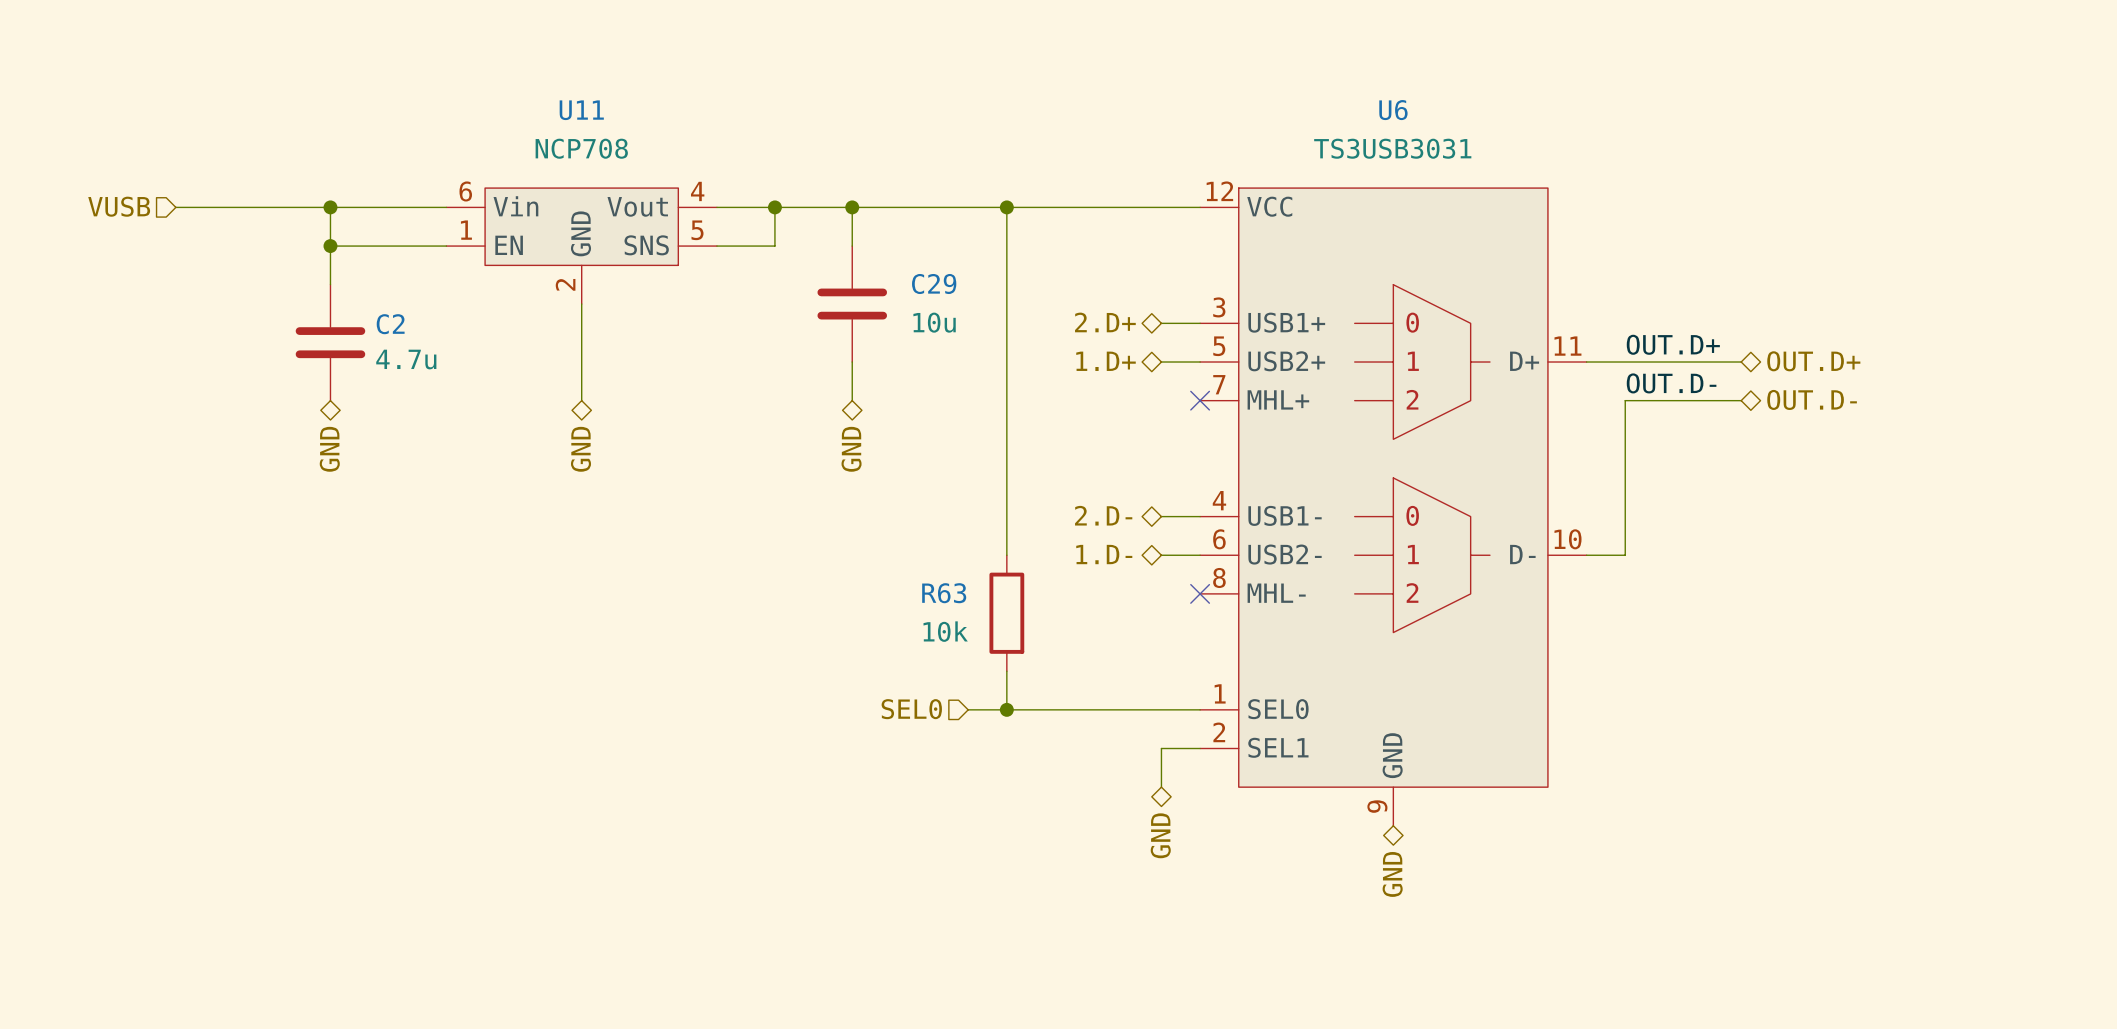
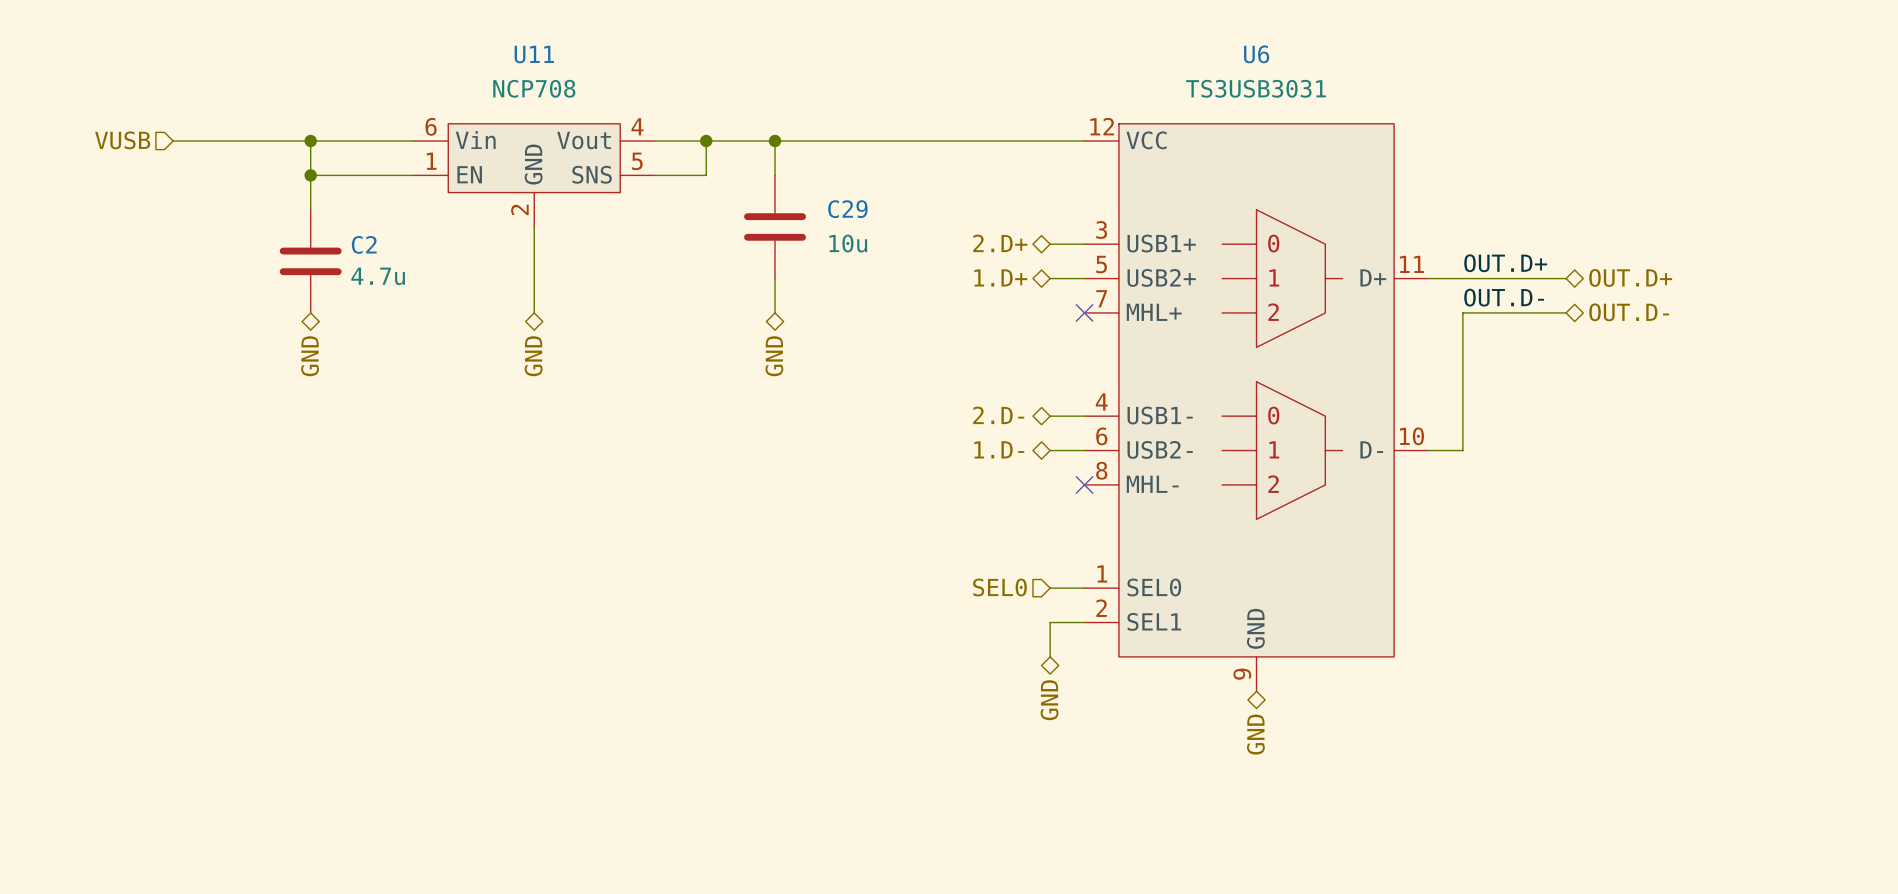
wire: (1006, 207) (1006, 555) -> none
junction: (1006, 207) -> none
R63: 10k (1006, 613) -> none
wire: (1006, 671) (1006, 709) -> none
hierarchical label position: SEL0 (911, 709) -> SEL0 (999, 587)
wire: (968, 709) (1161, 709) -> none
junction: (1006, 709) -> none

